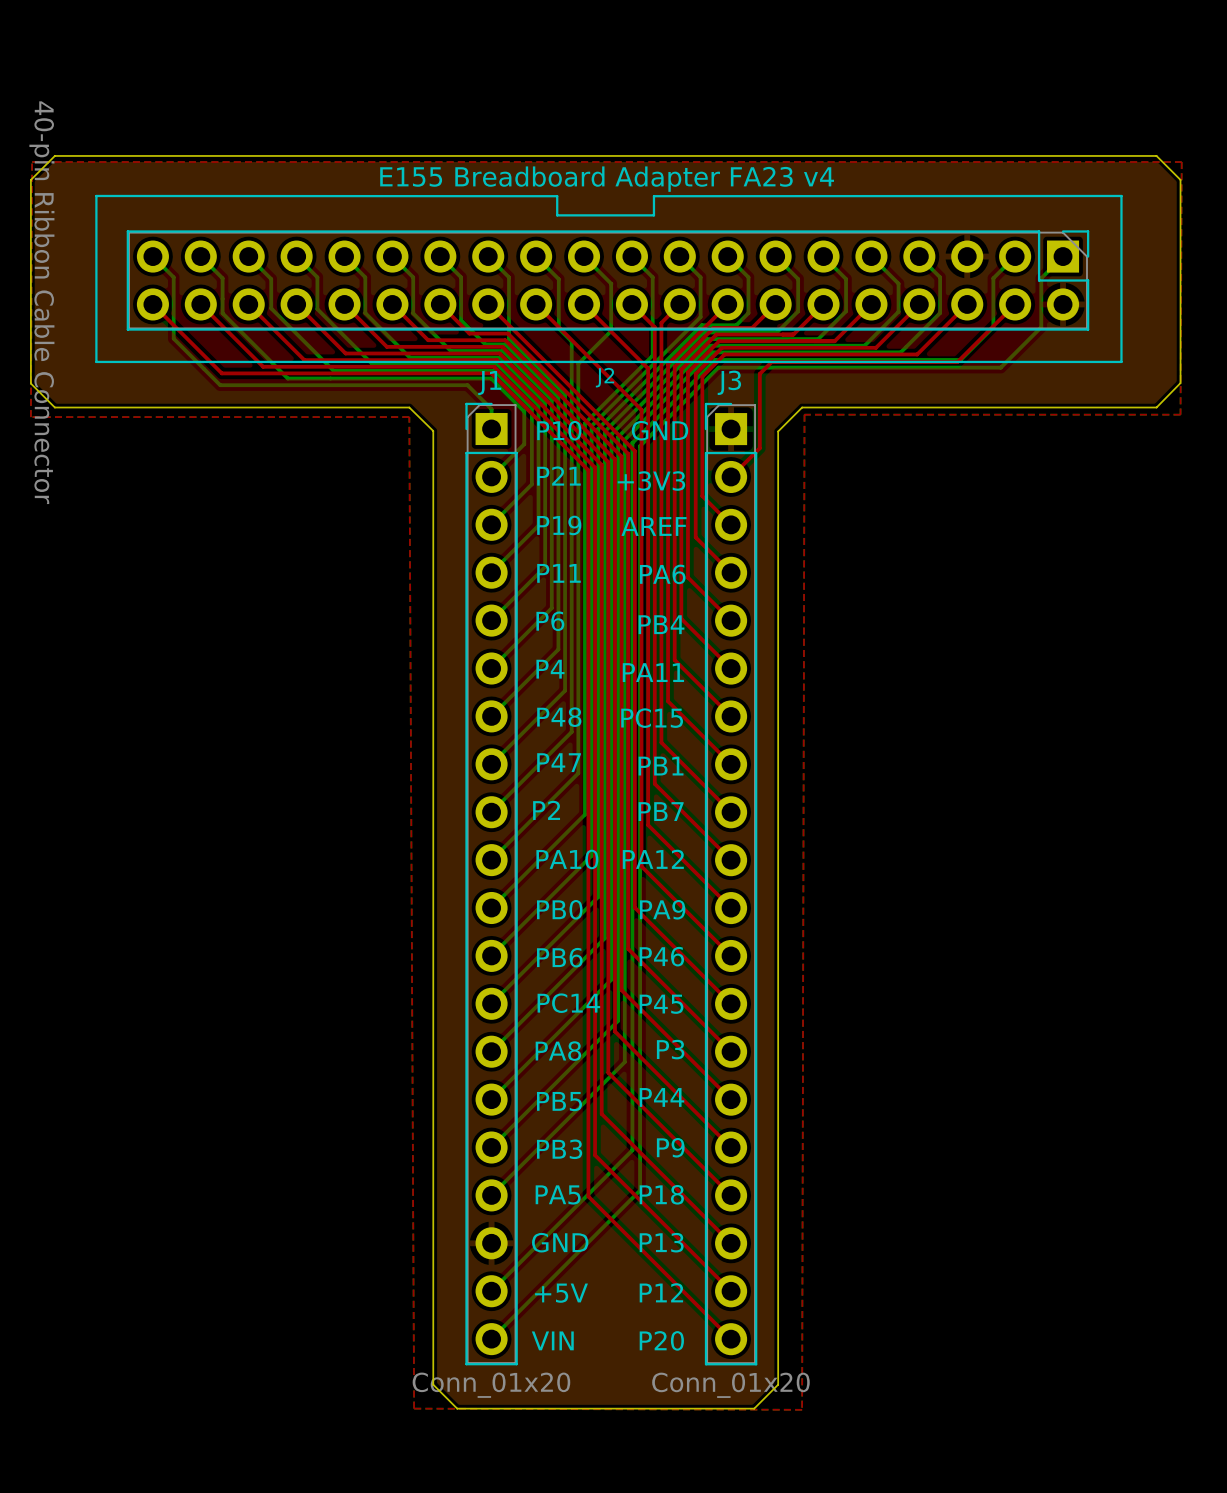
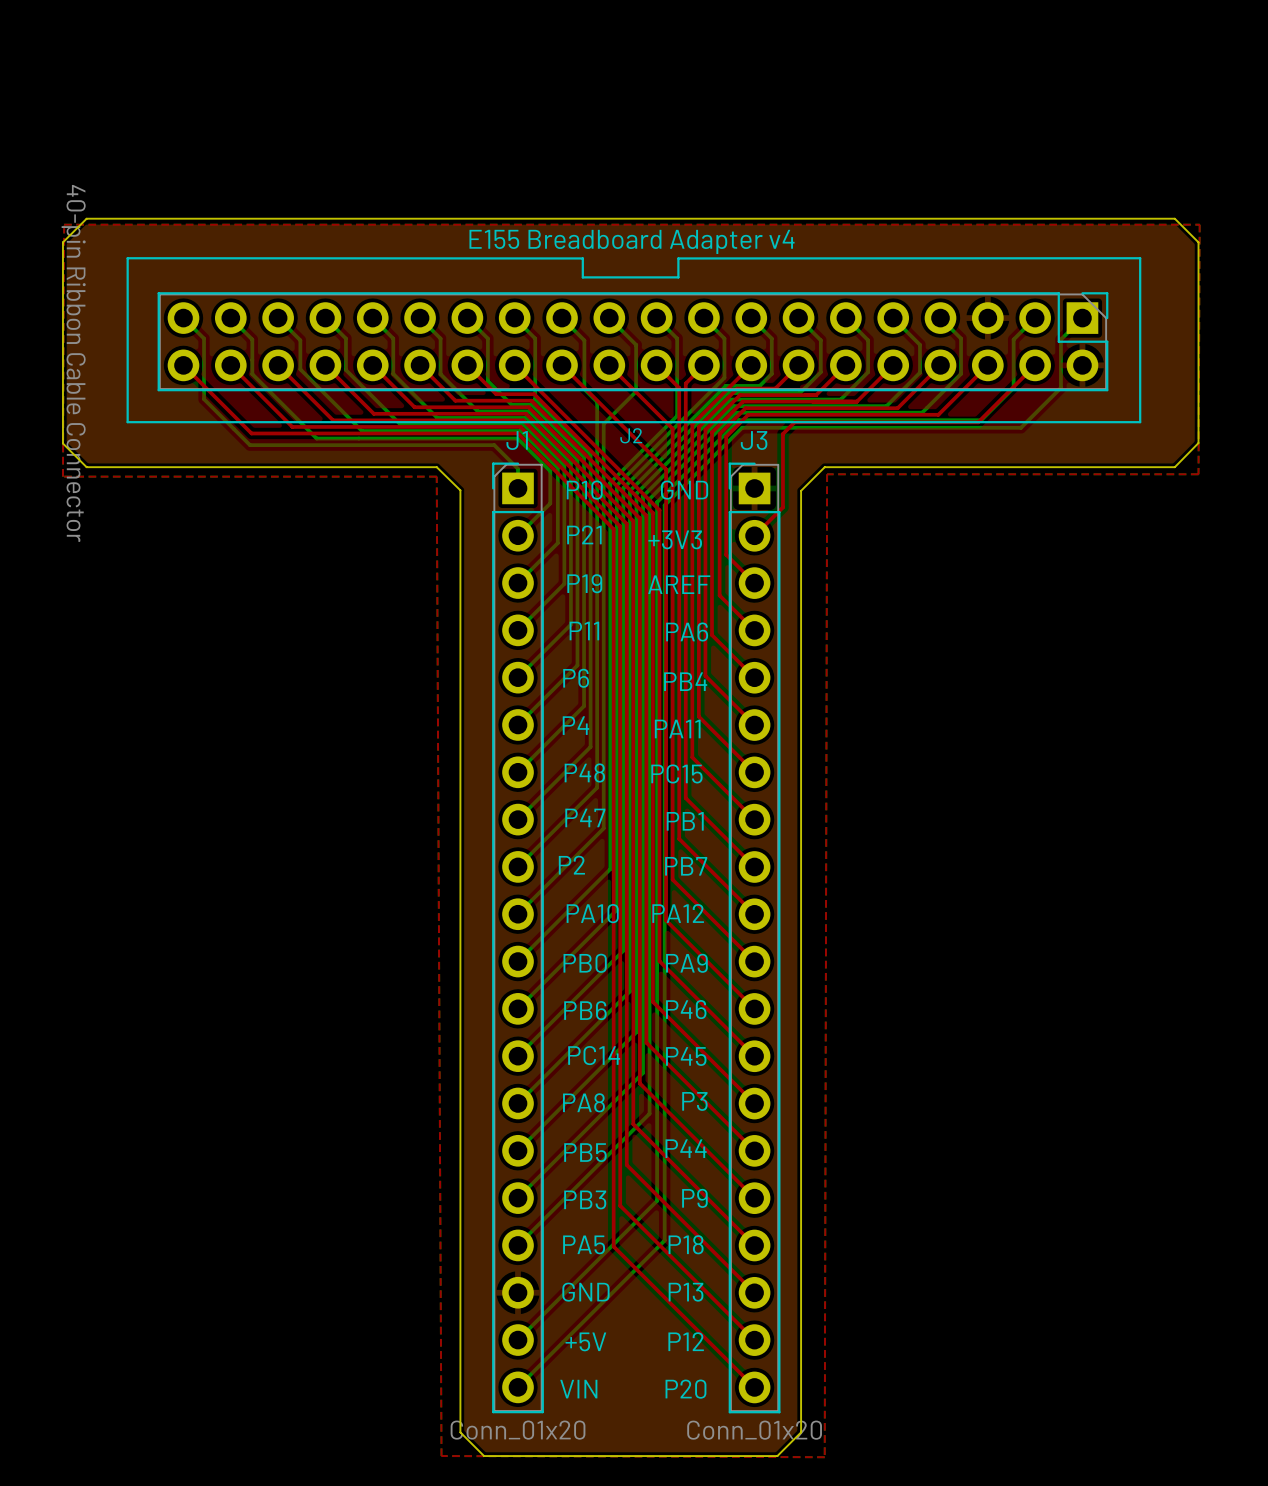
text: E155 Breadboard Adapter FA23 v4 (607, 179) -> E155 Breadboard Adapter v4 (632, 241)

